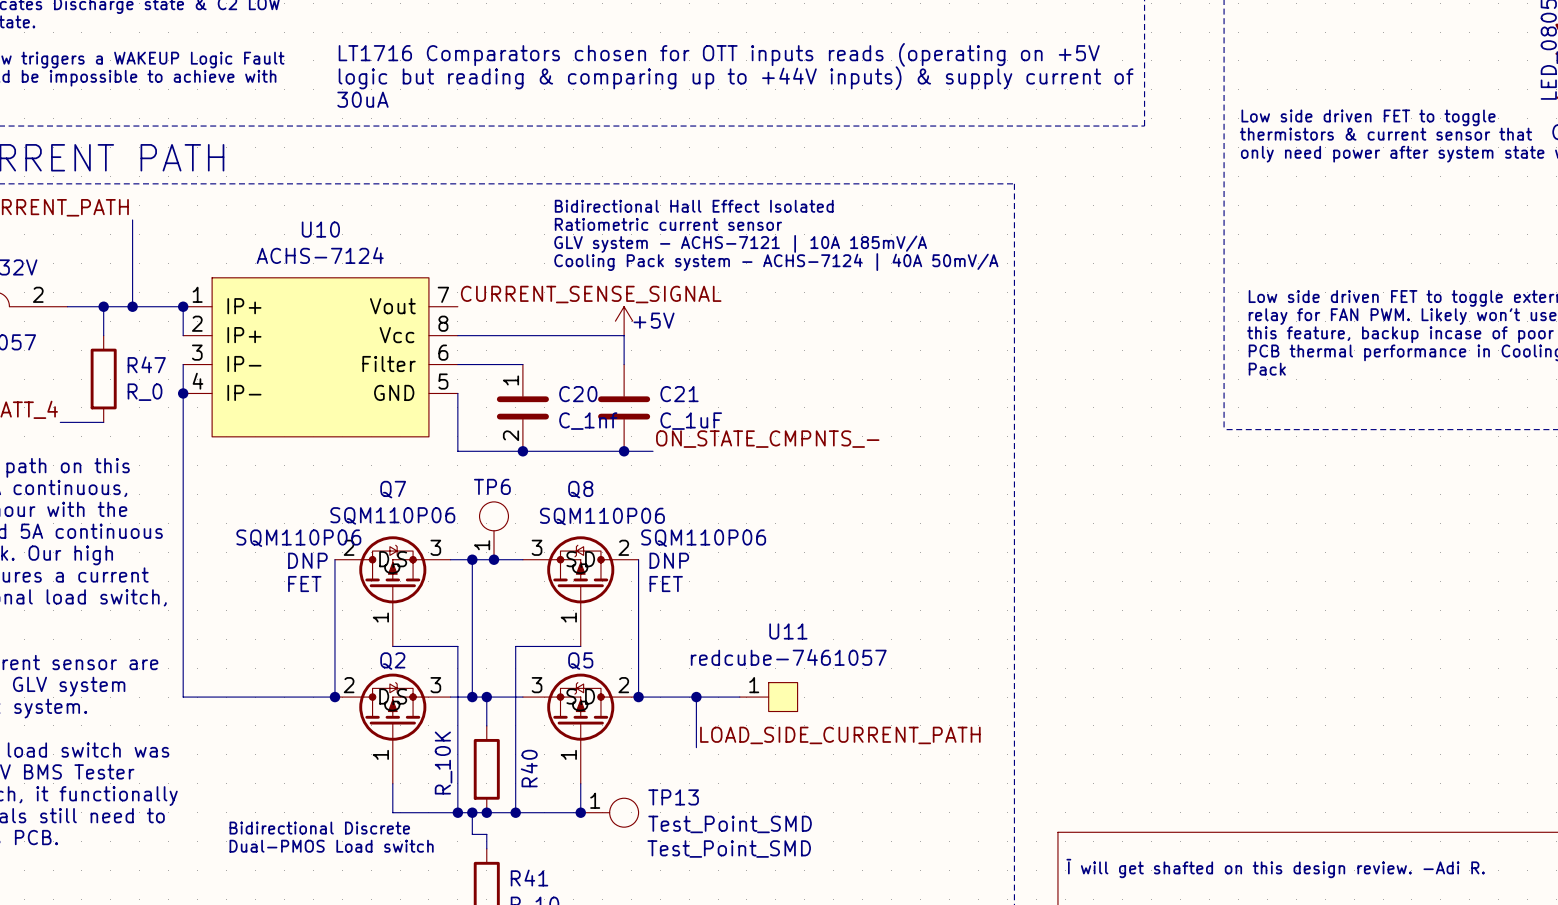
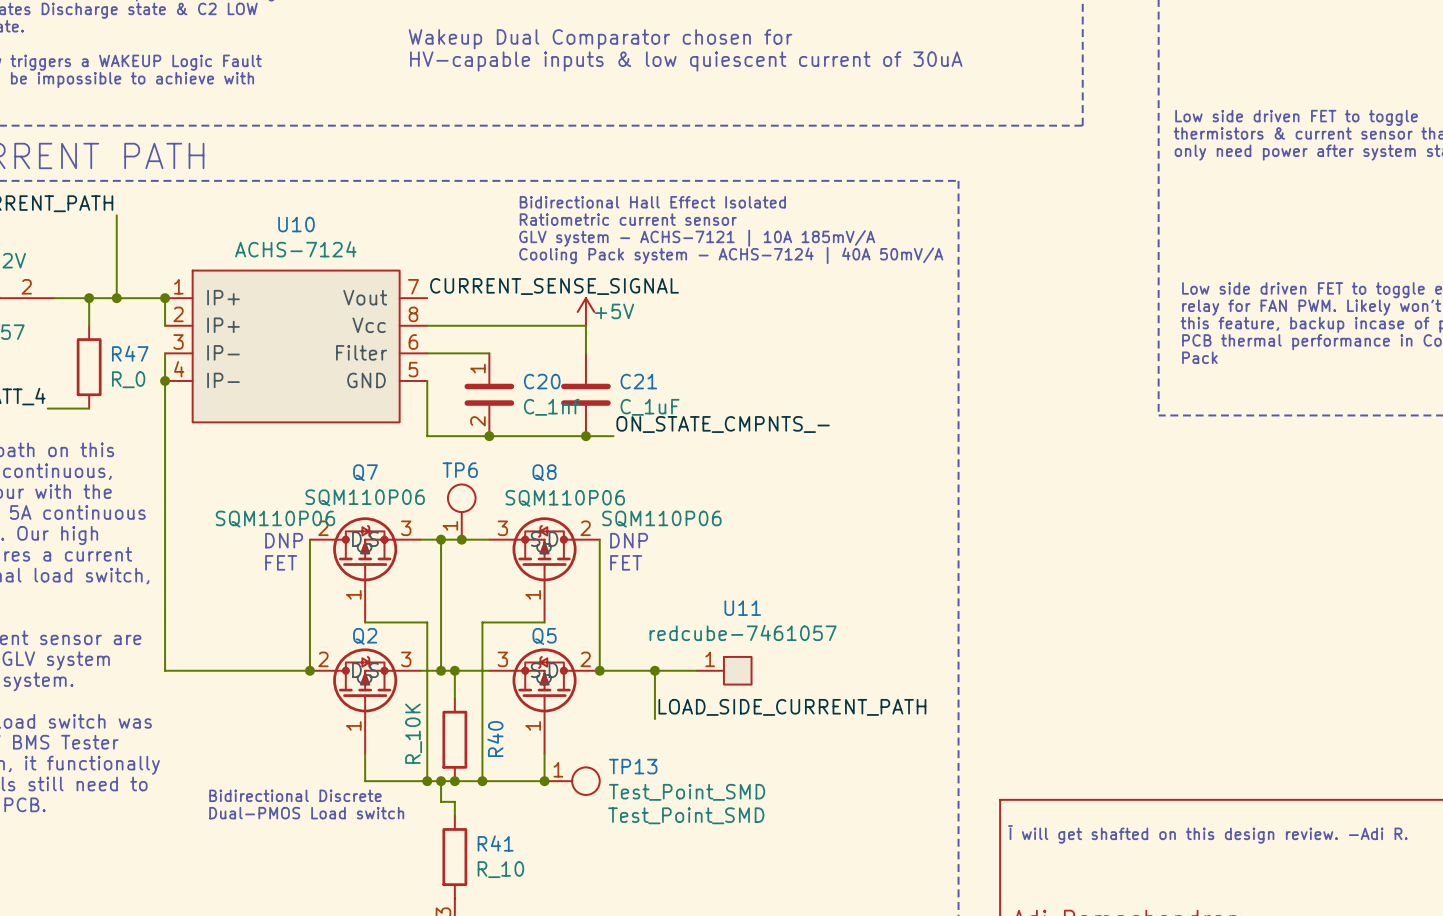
text: none -> Wakeup Dual Comparator chosen for (600, 39)
text: LT1716 Comparators chosen for OTT inputs reads (operating on +5V (719, 54) -> none
text: none -> HV-capable inputs & low quiescent current of 30uA (686, 61)
text: logic but reading & comparing up to +44V inputs) & supply current of (736, 78) -> none
text: 30uA (362, 99) -> none

